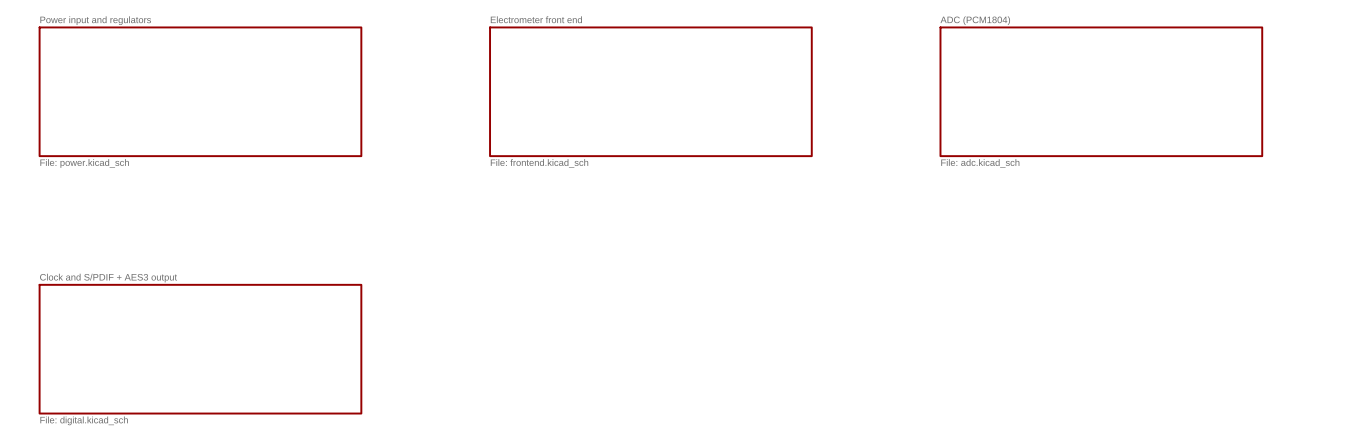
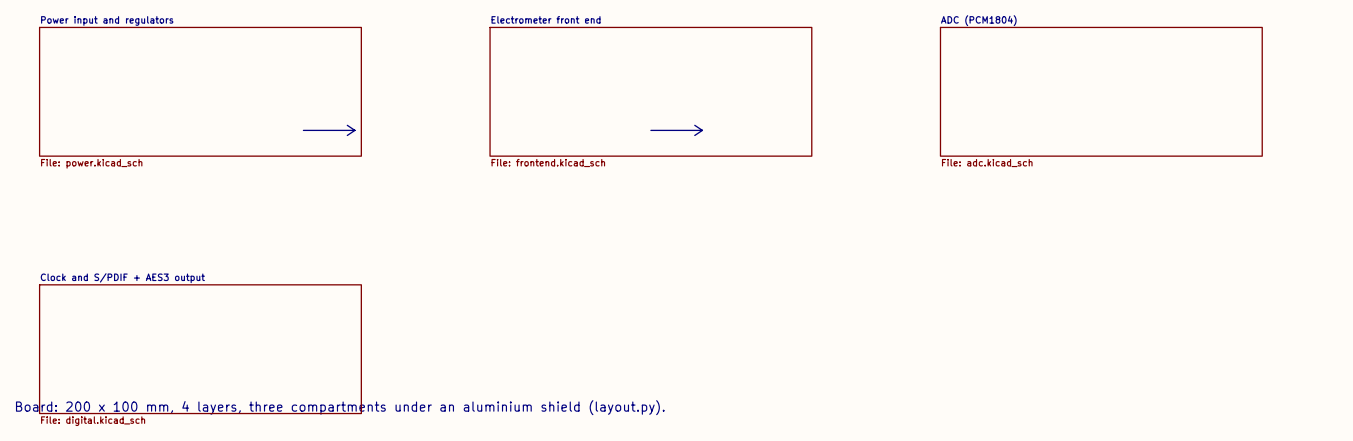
line: none -> (347, 125) (354, 130)
line: none -> (694, 125) (702, 130)
line: none -> (303, 130) (354, 130)
line: none -> (354, 130) (347, 135)
line: none -> (650, 130) (702, 130)
line: none -> (702, 130) (694, 135)
text: none -> Board: 200 x 100 mm, 4 layers, three compartments under an aluminium shield (layout.py). (340, 407)

